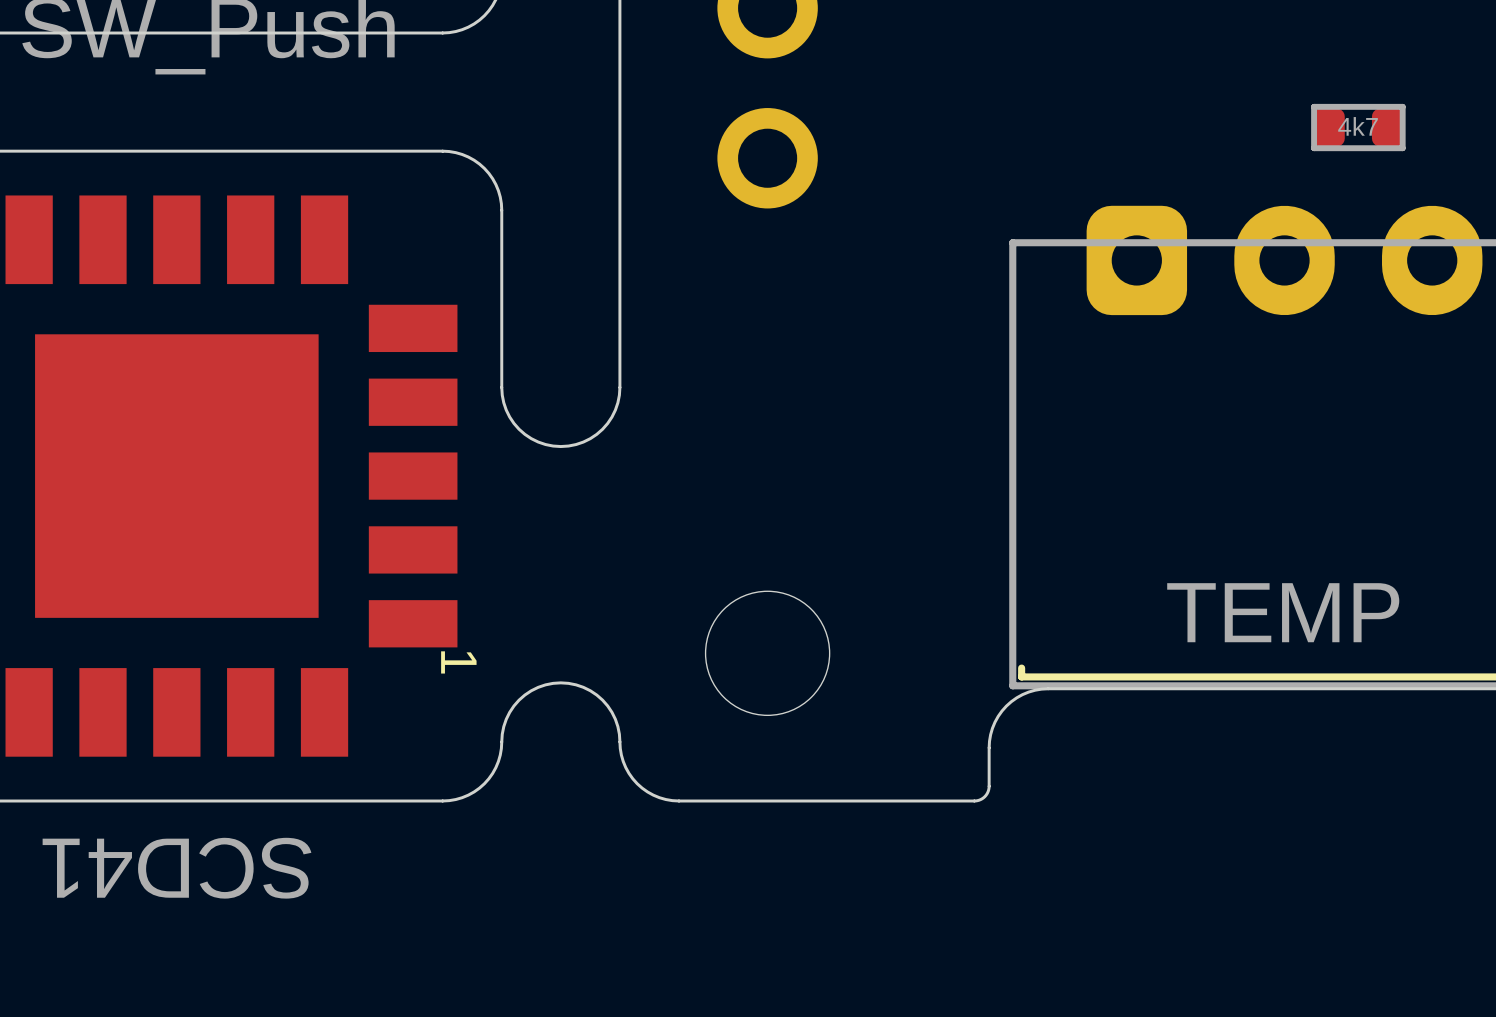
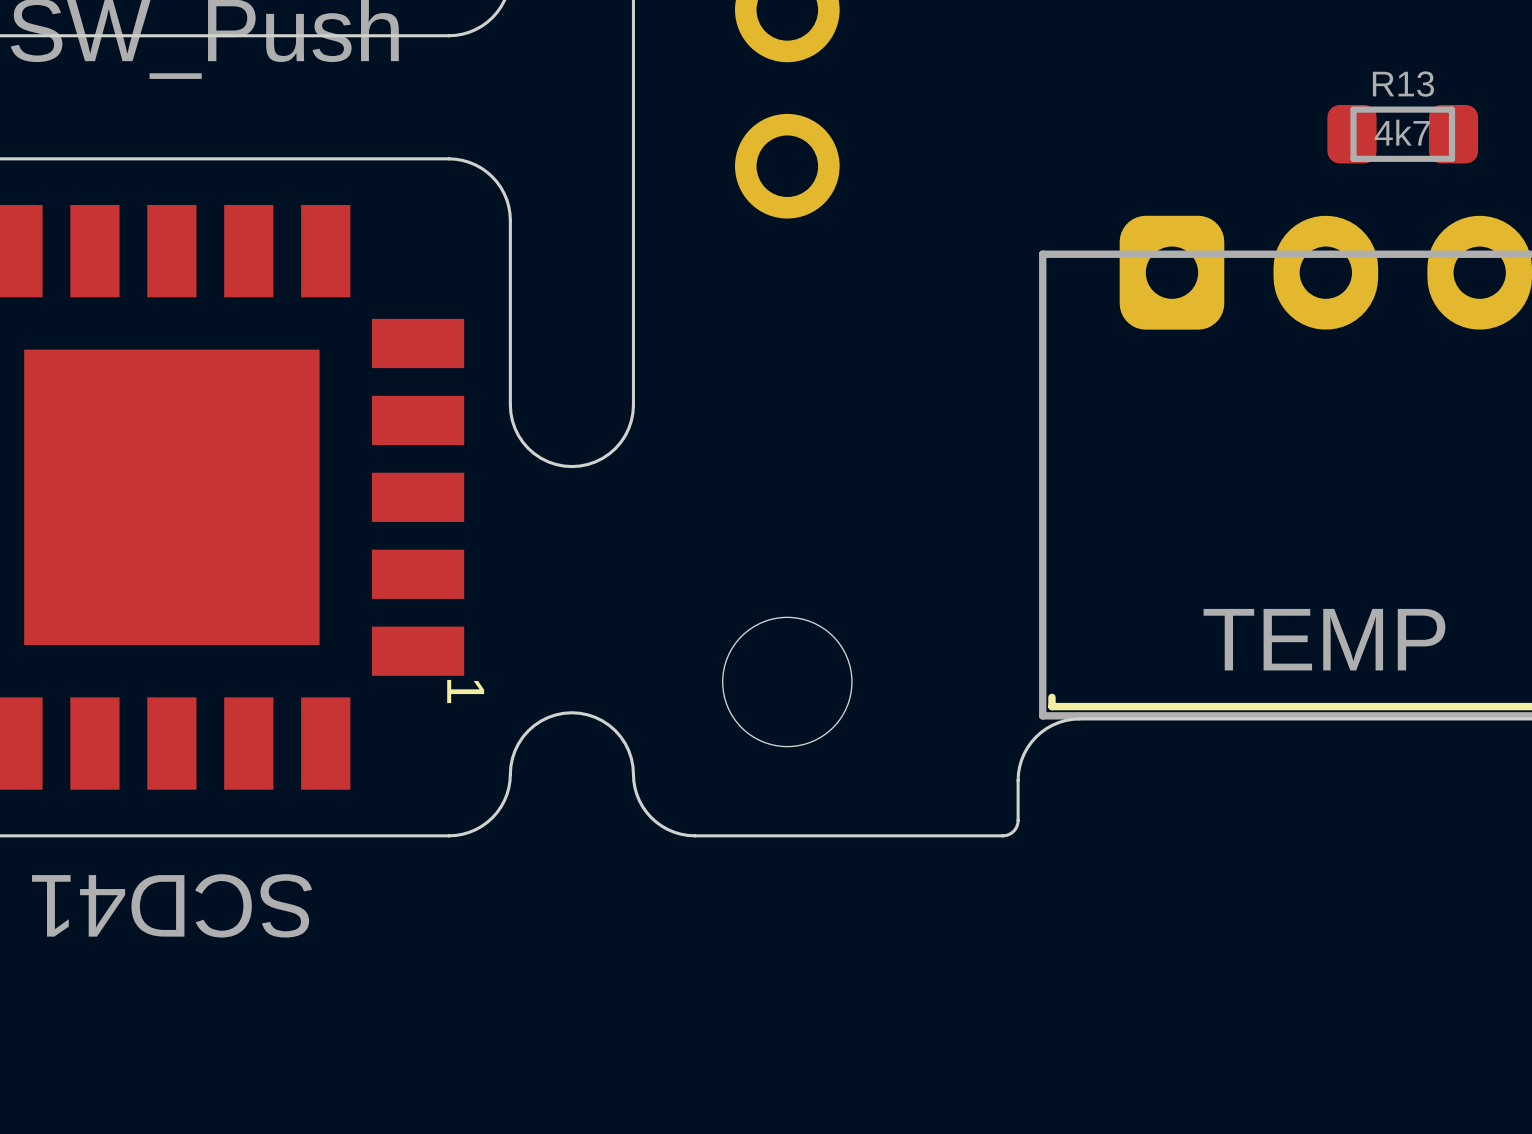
part: 4k7 (1358, 127) -> none
R13: none -> 4k7 (1402, 134)

